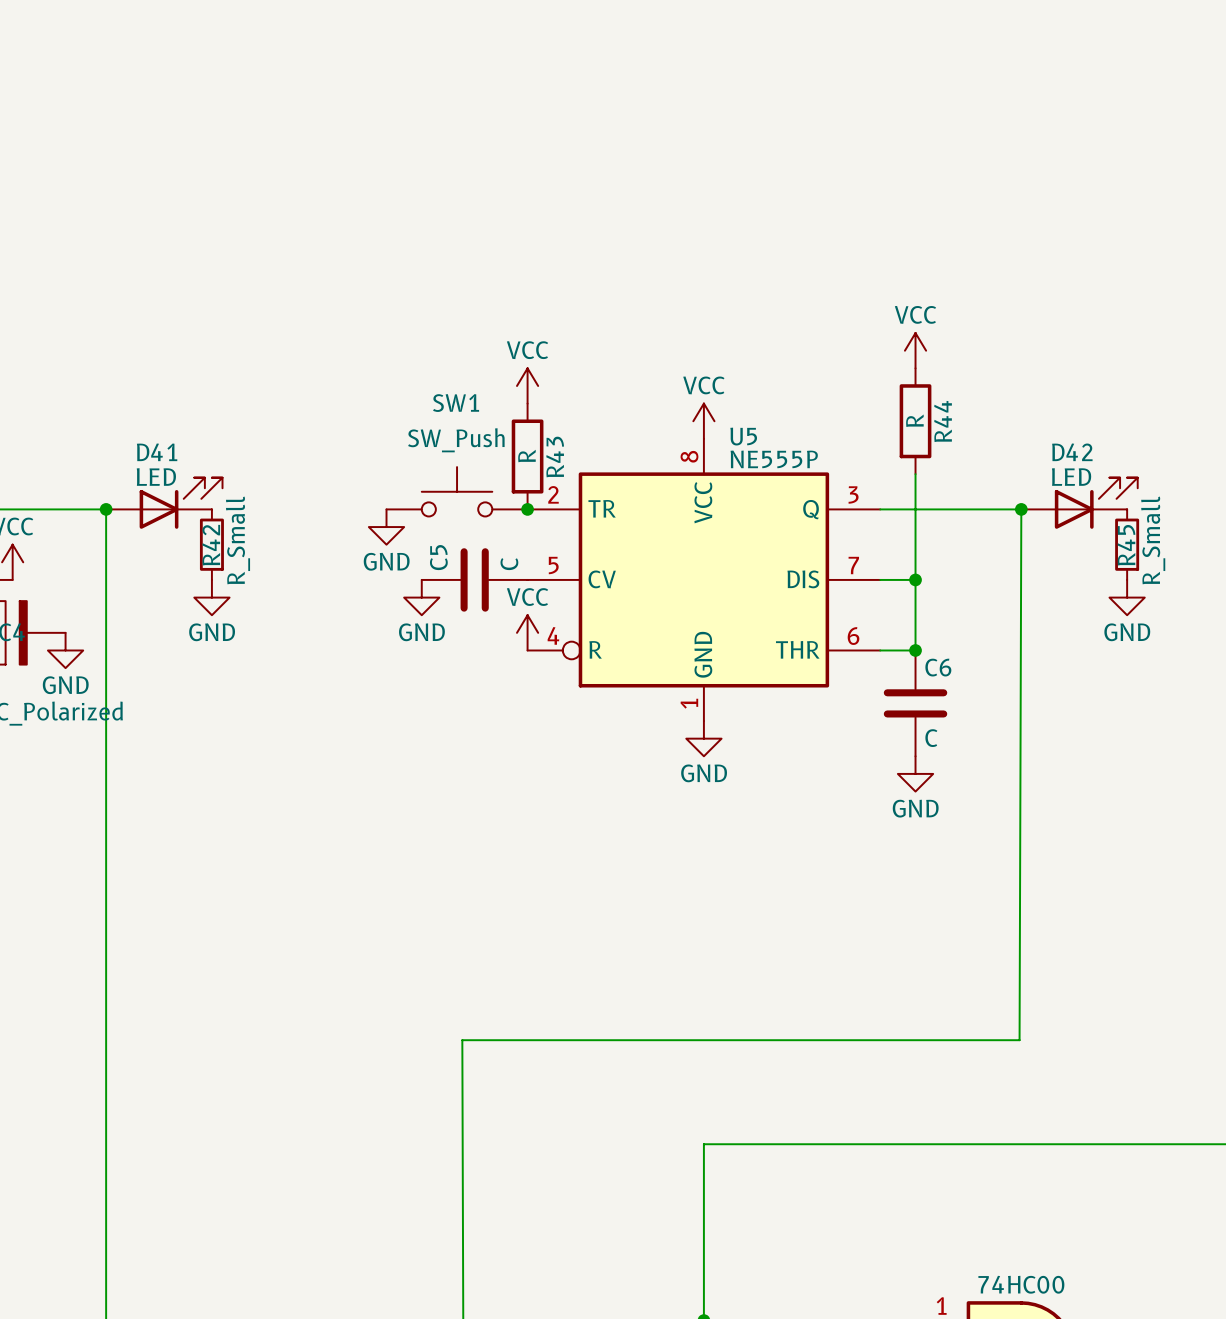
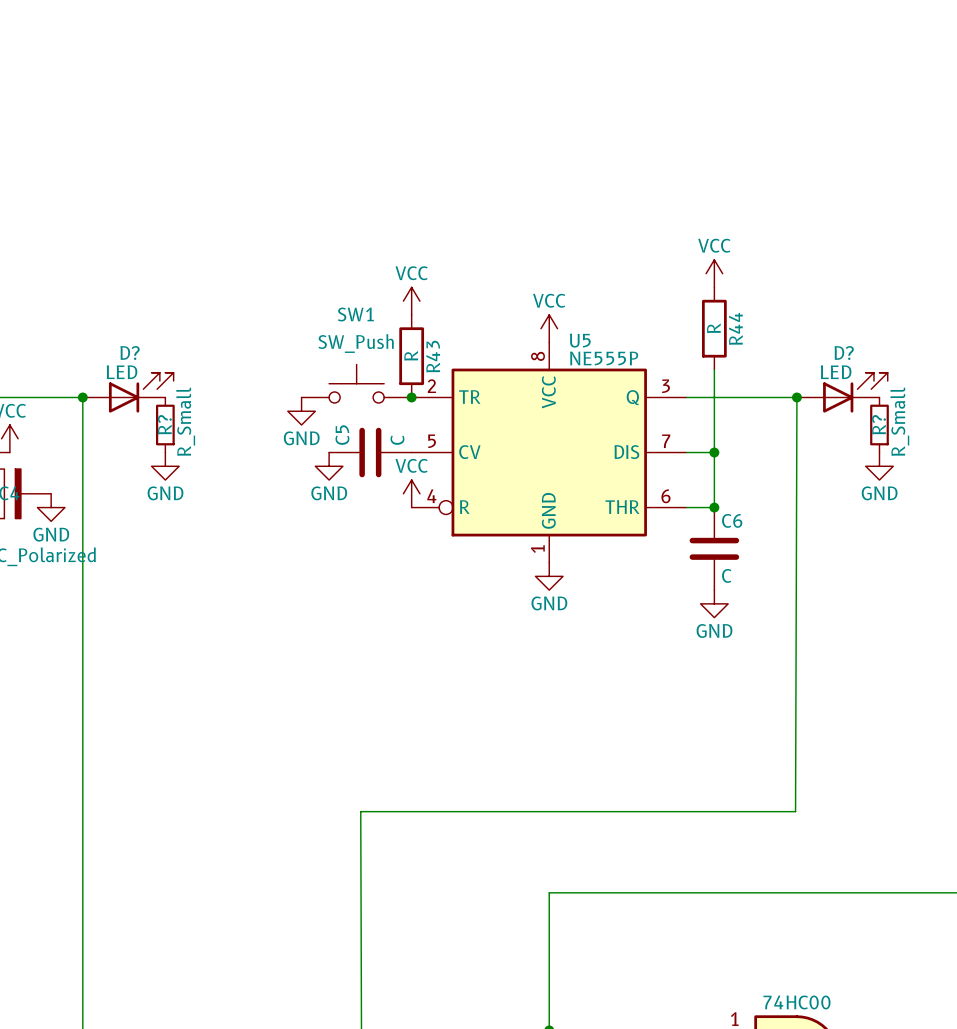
D41 name: D41 (157, 452) -> D? (130, 353)
D42 name: D42 (1072, 452) -> D? (844, 353)
R42 name: R42 (211, 545) -> R? (164, 424)
R45 name: R45 (1126, 545) -> R? (879, 424)

